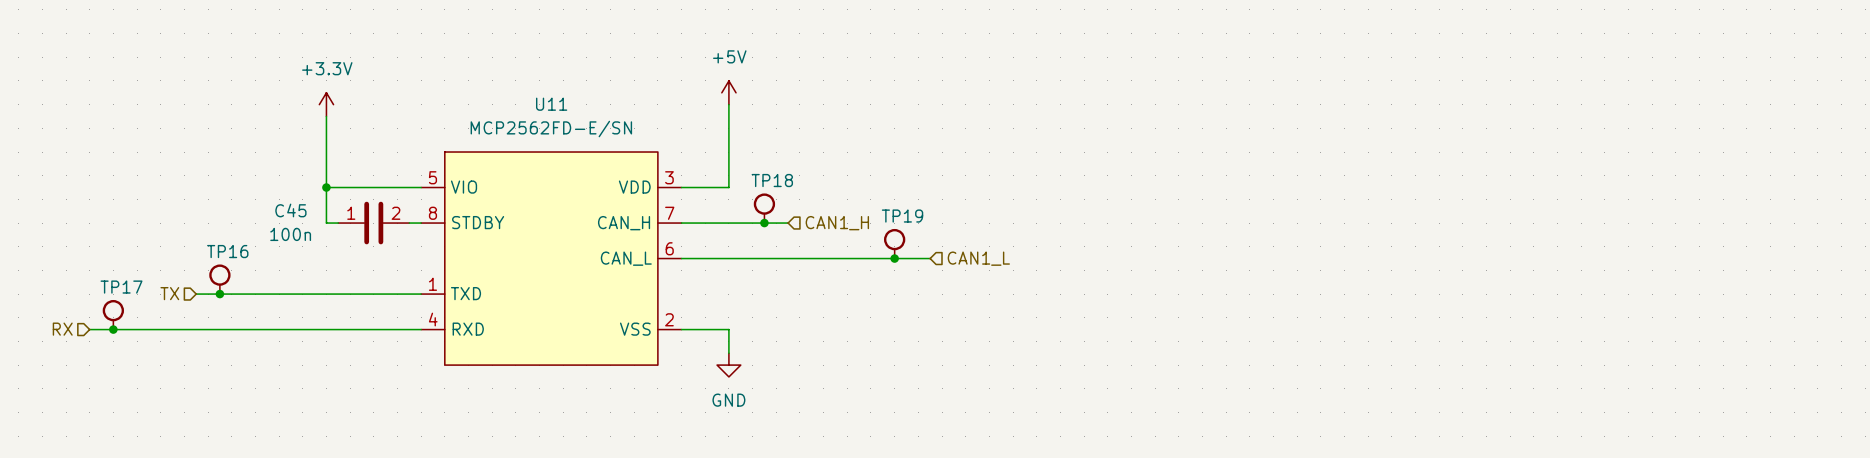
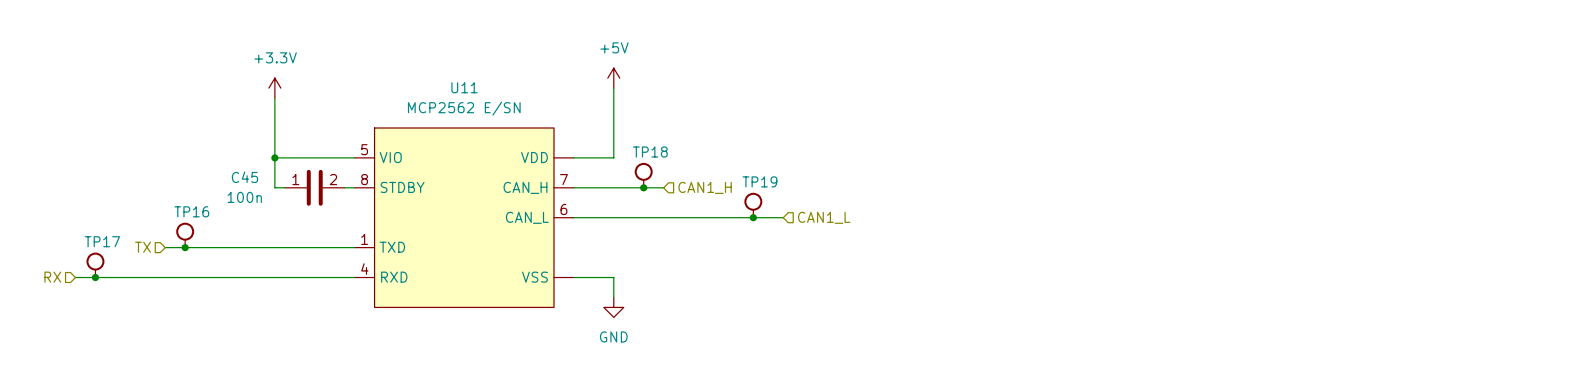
U11 value: MCP2562FD-E/SN (551, 129) -> MCP2562 E/SN (464, 108)
U11 pin number: 3 (669, 177) -> none
U11 pin number: 2 (669, 319) -> none

